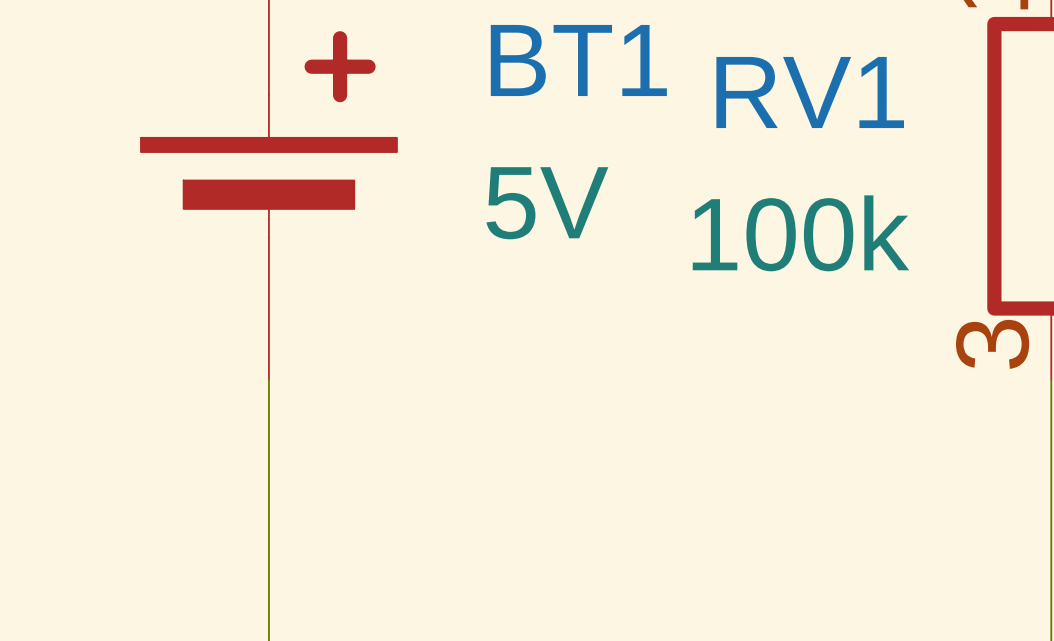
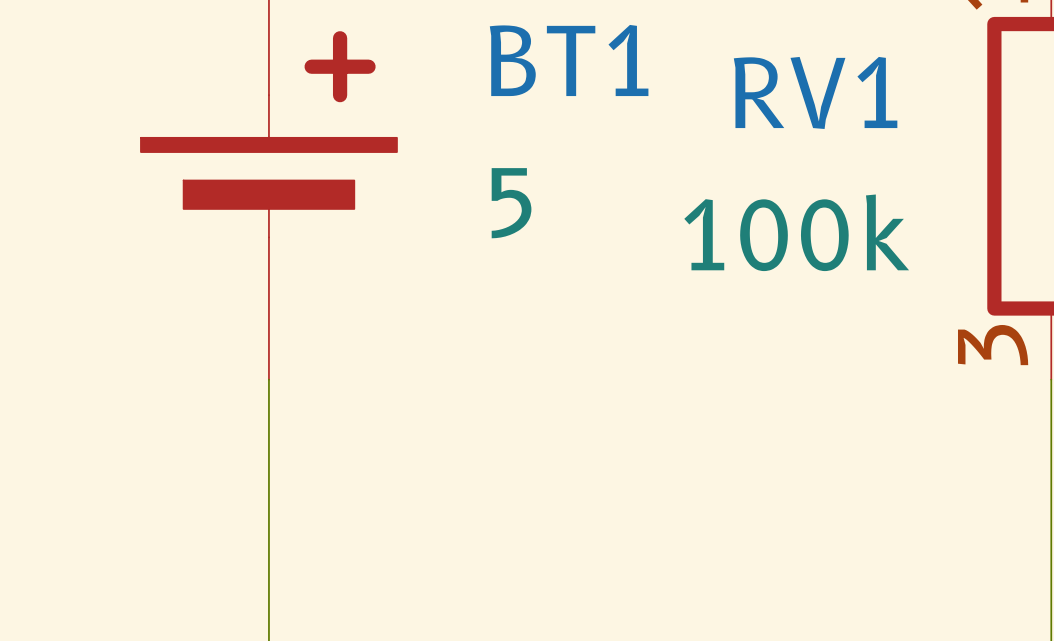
BT1 value: 5V (547, 203) -> 5 (511, 203)

